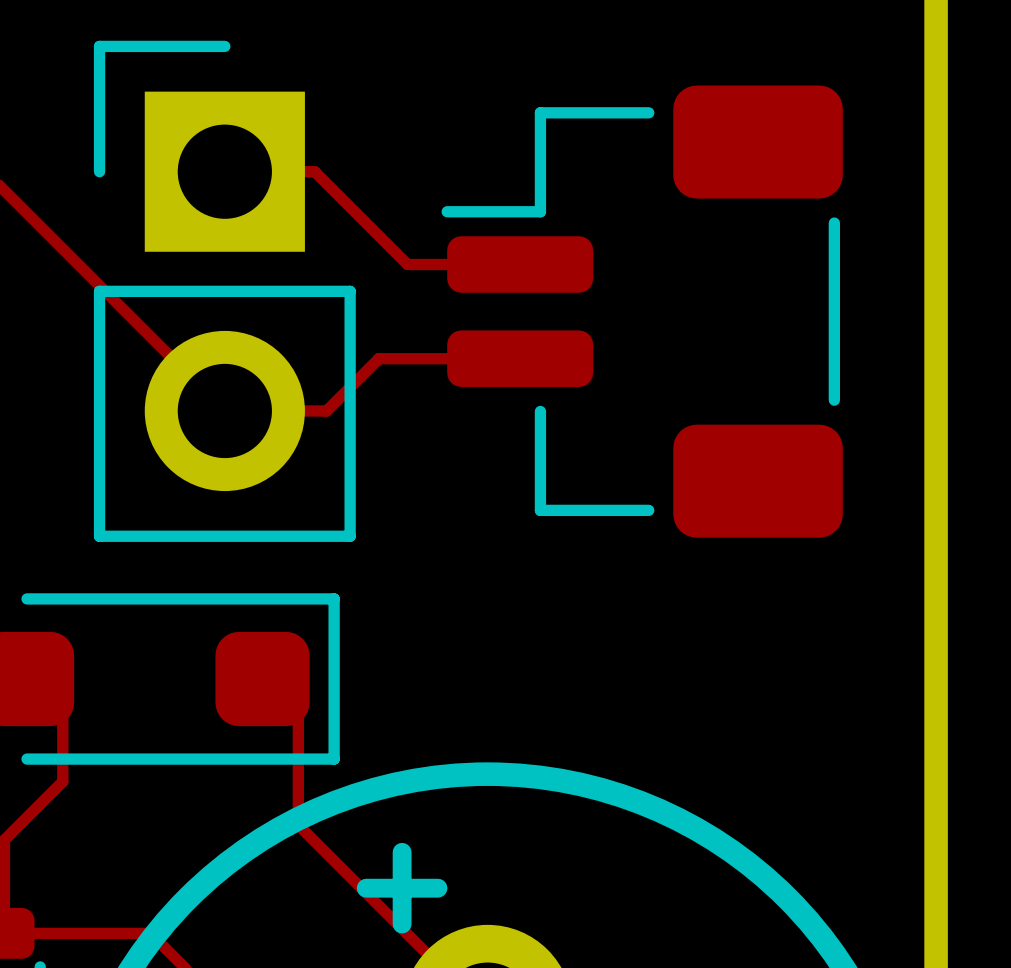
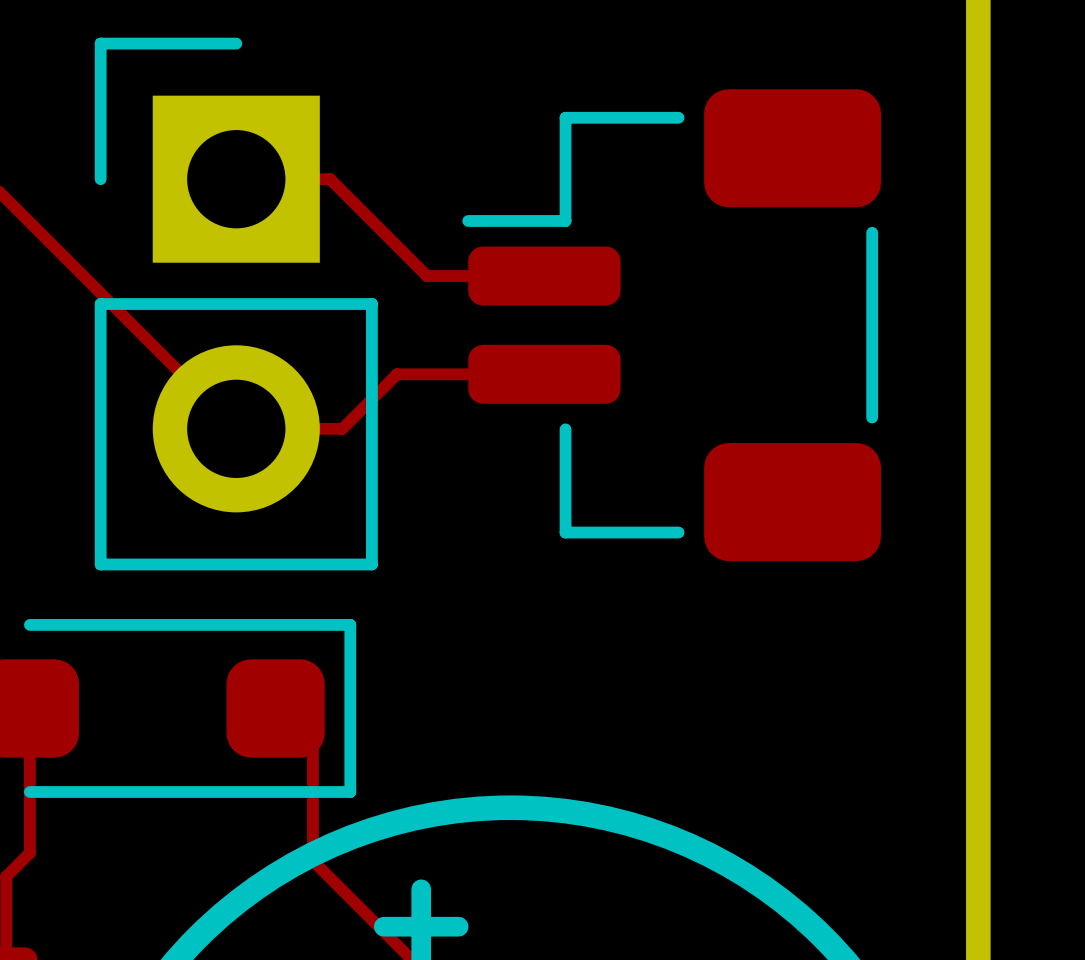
part footprint: [93, 40, 356, 542] -> [94, 37, 378, 571]
top track: (62, 684) (62, 781) (27, 817) -> (67, 714) (29, 751) (29, 852)

